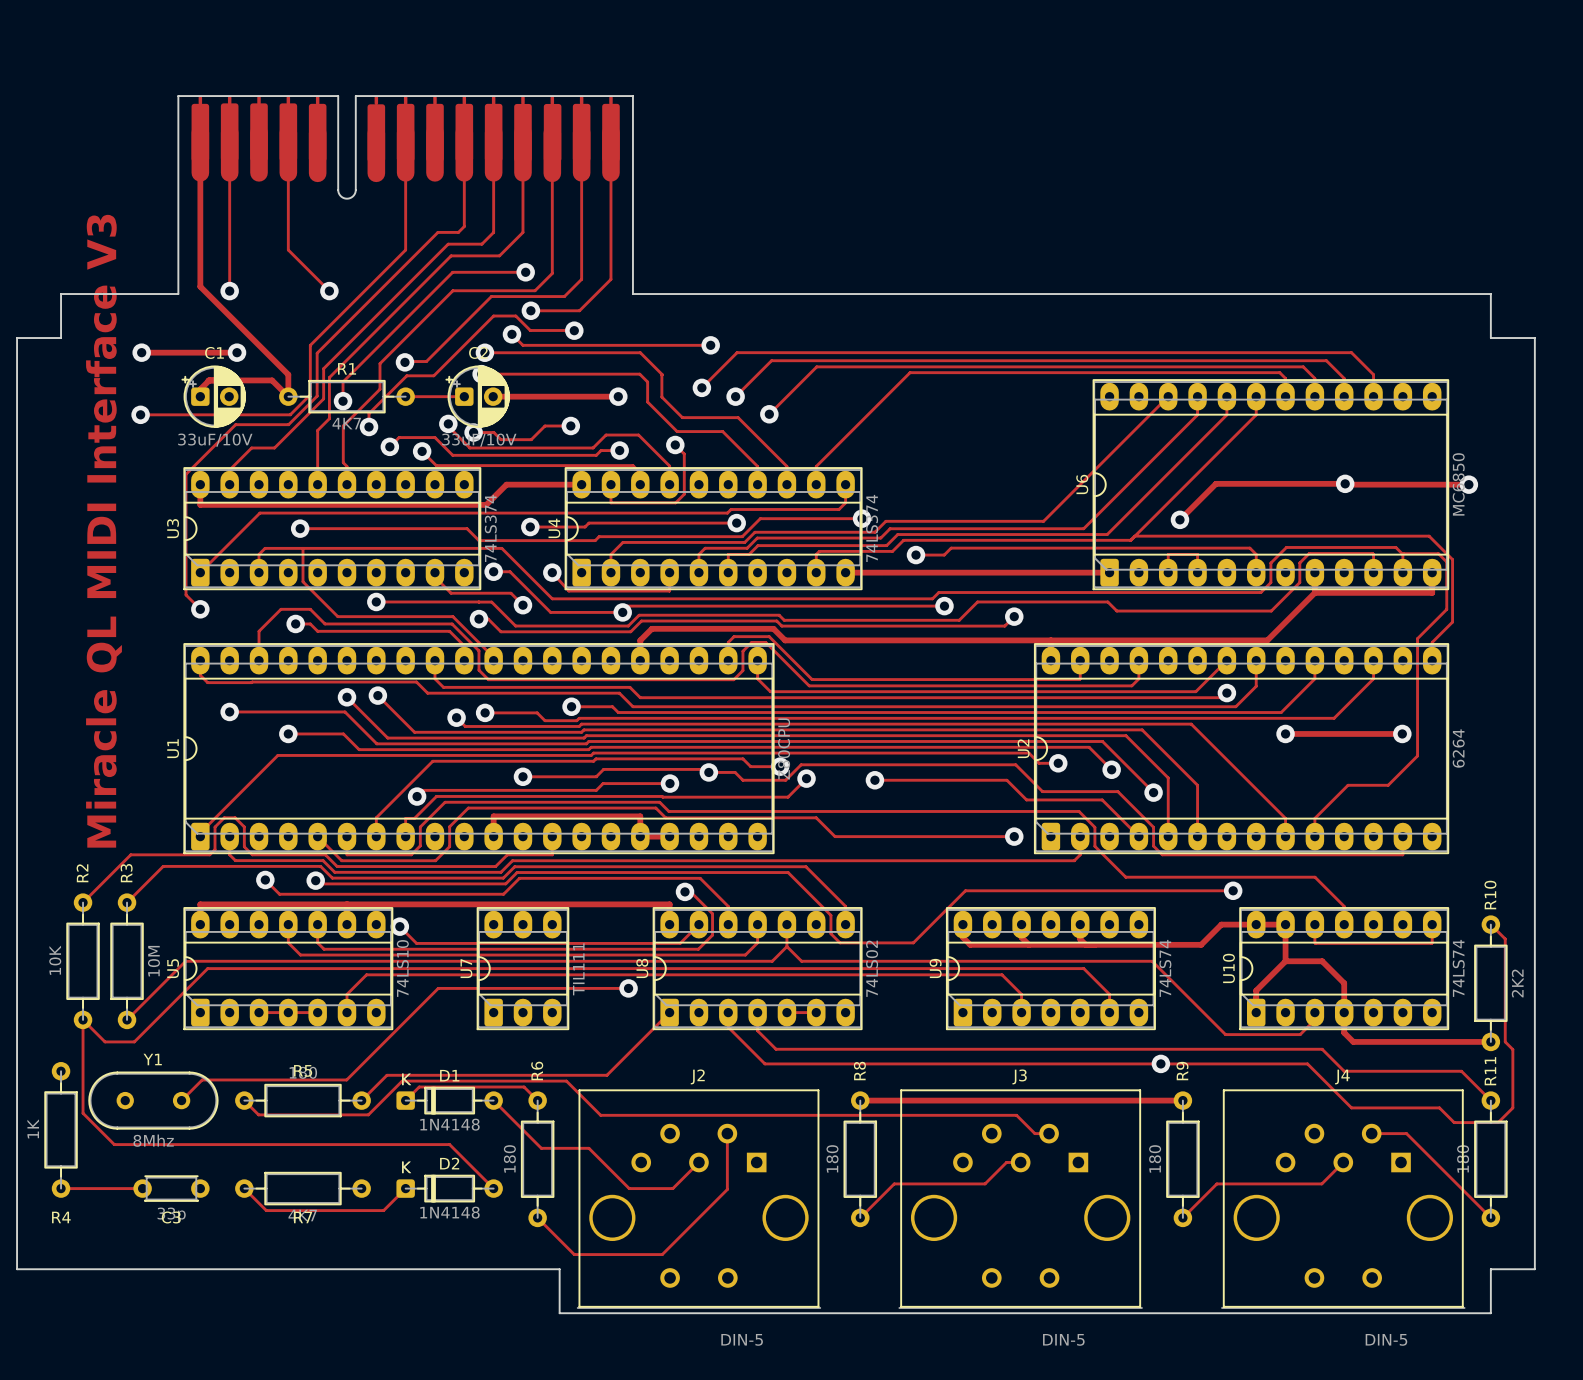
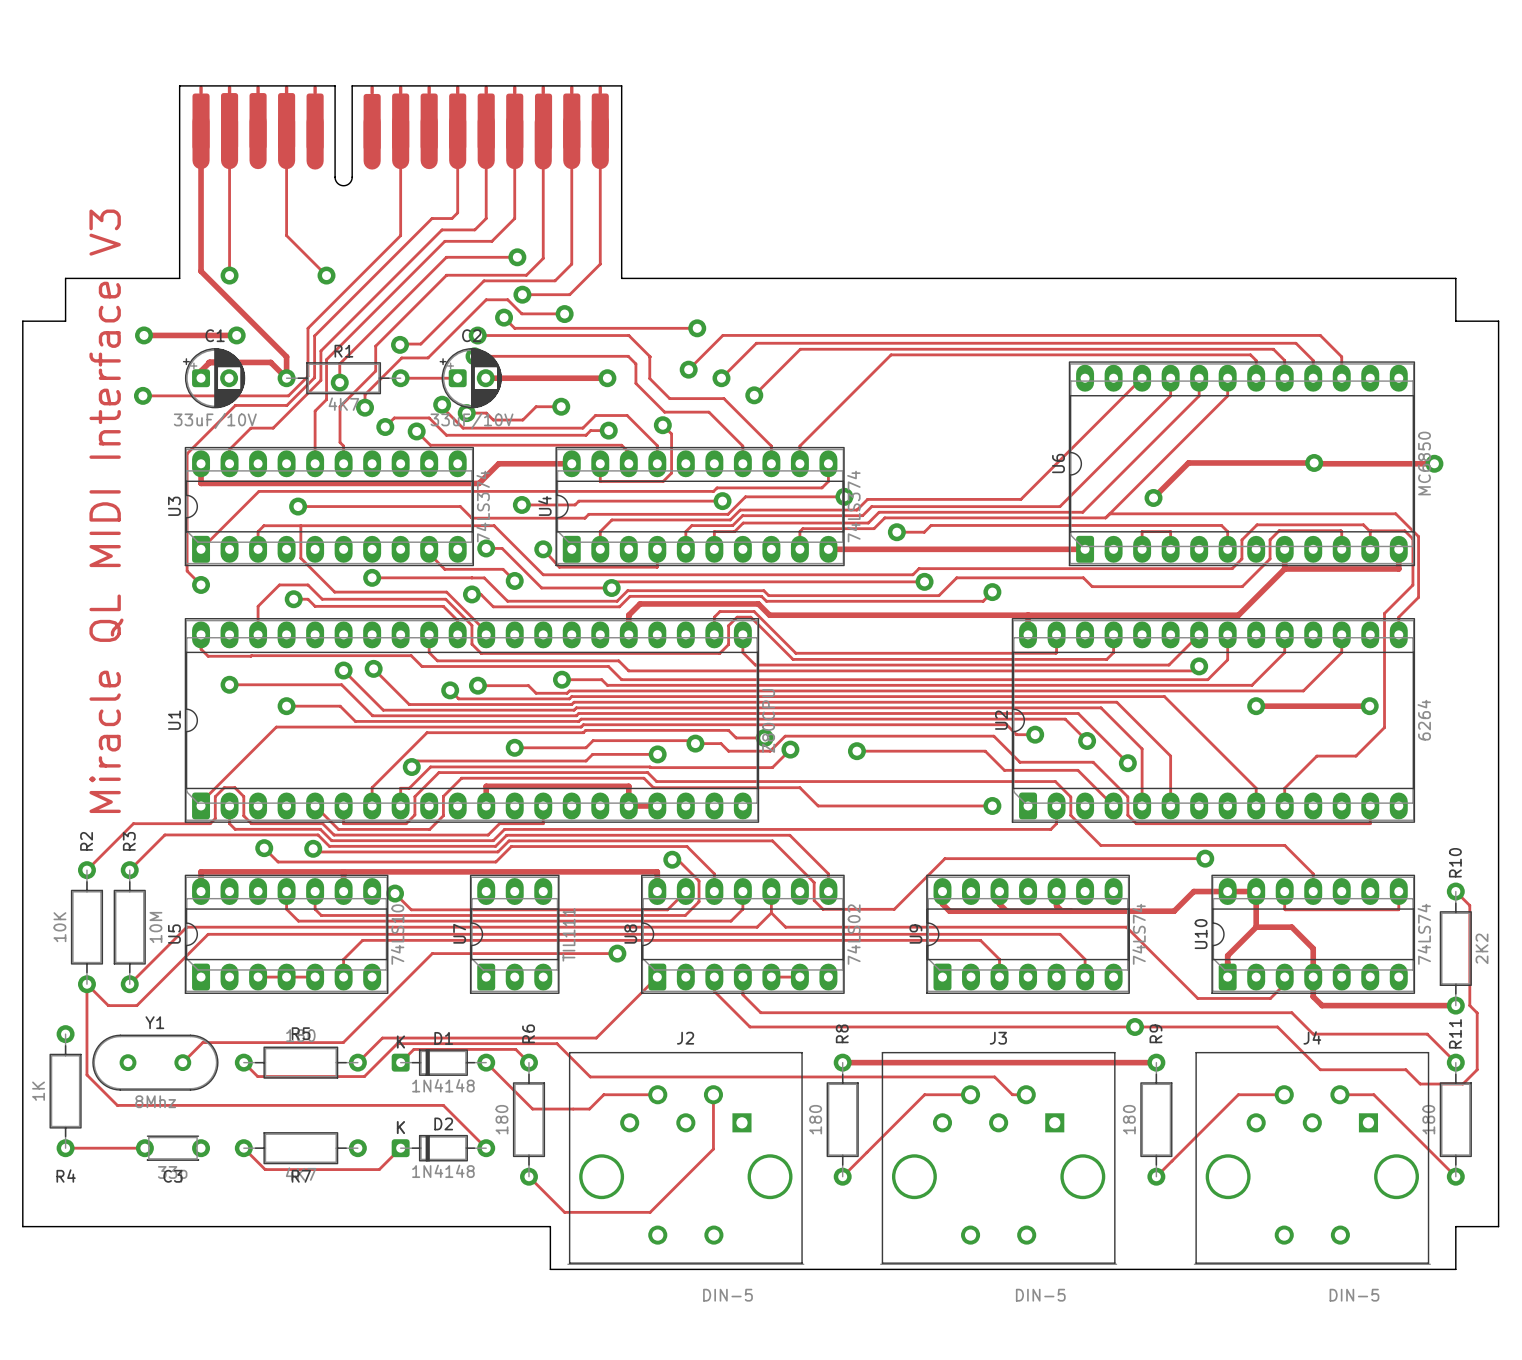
track: (588, 1148) (629, 1188) (672, 1188) (698, 1162) -> (578, 1109) (589, 1109) (603, 1094) (657, 1094)
track: (1020, 1162) (1006, 1162) (985, 1183) (894, 1183) -> (970, 1094) (924, 1094) (875, 1143)
track: (1343, 1162) (1321, 1183) (1216, 1183) -> (1284, 1094) (1238, 1094) (1189, 1143)

